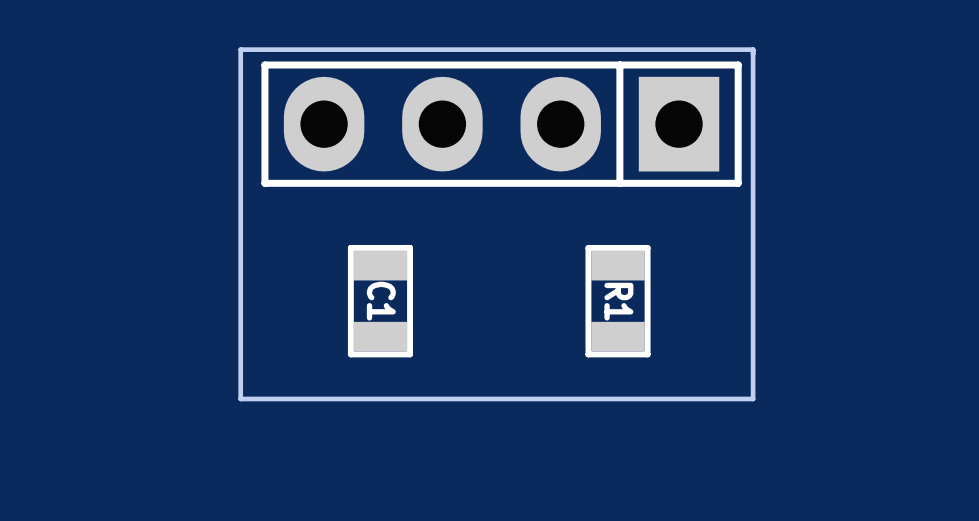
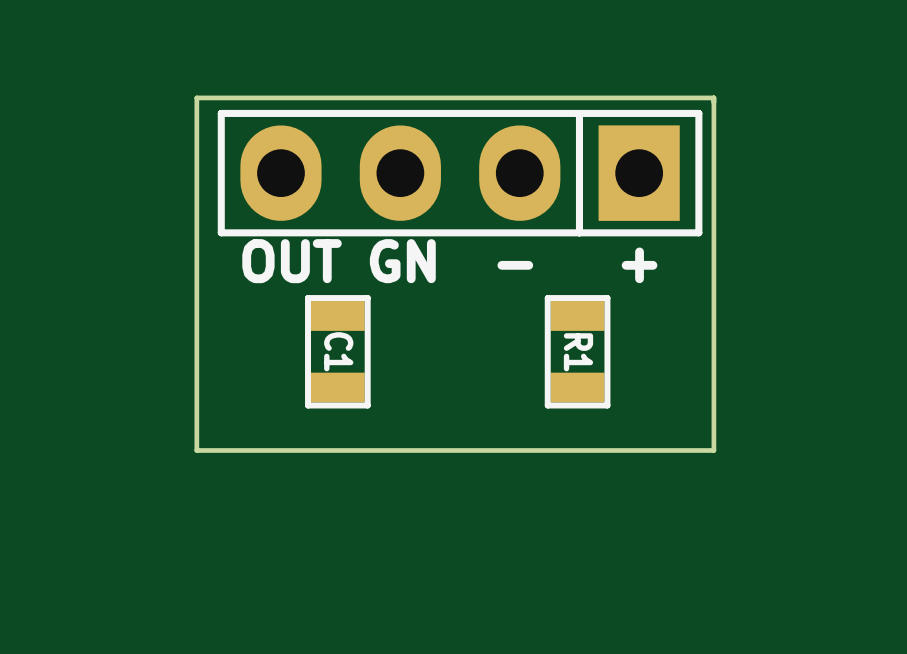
text: none -> OUT GN - + (449, 261)

